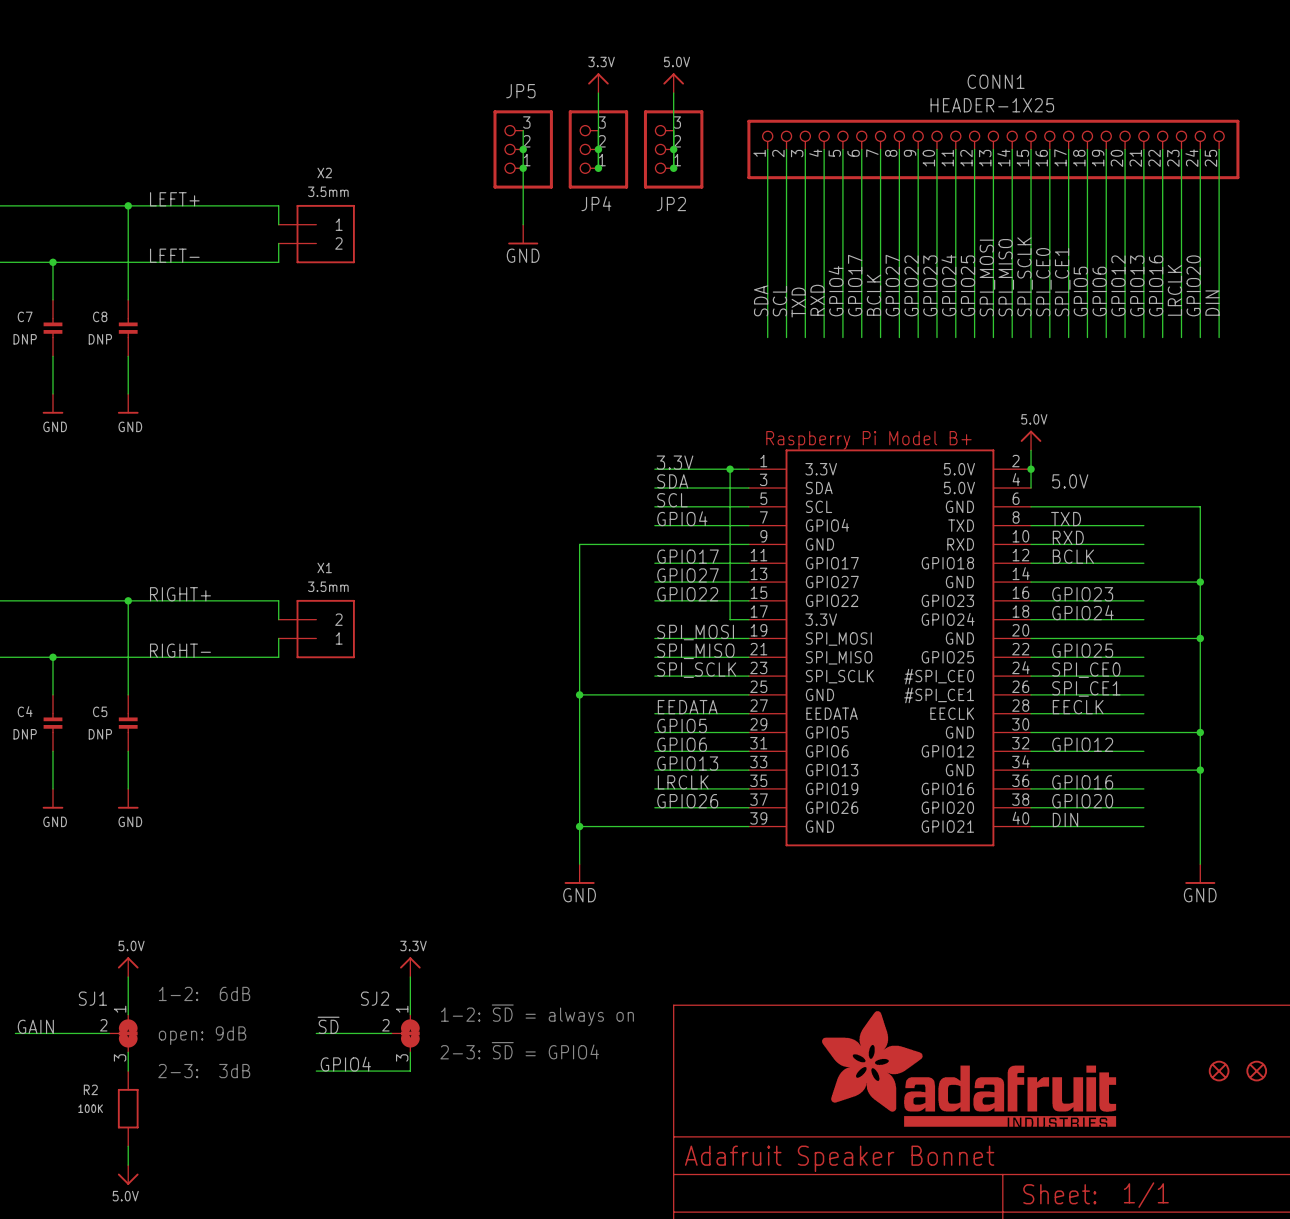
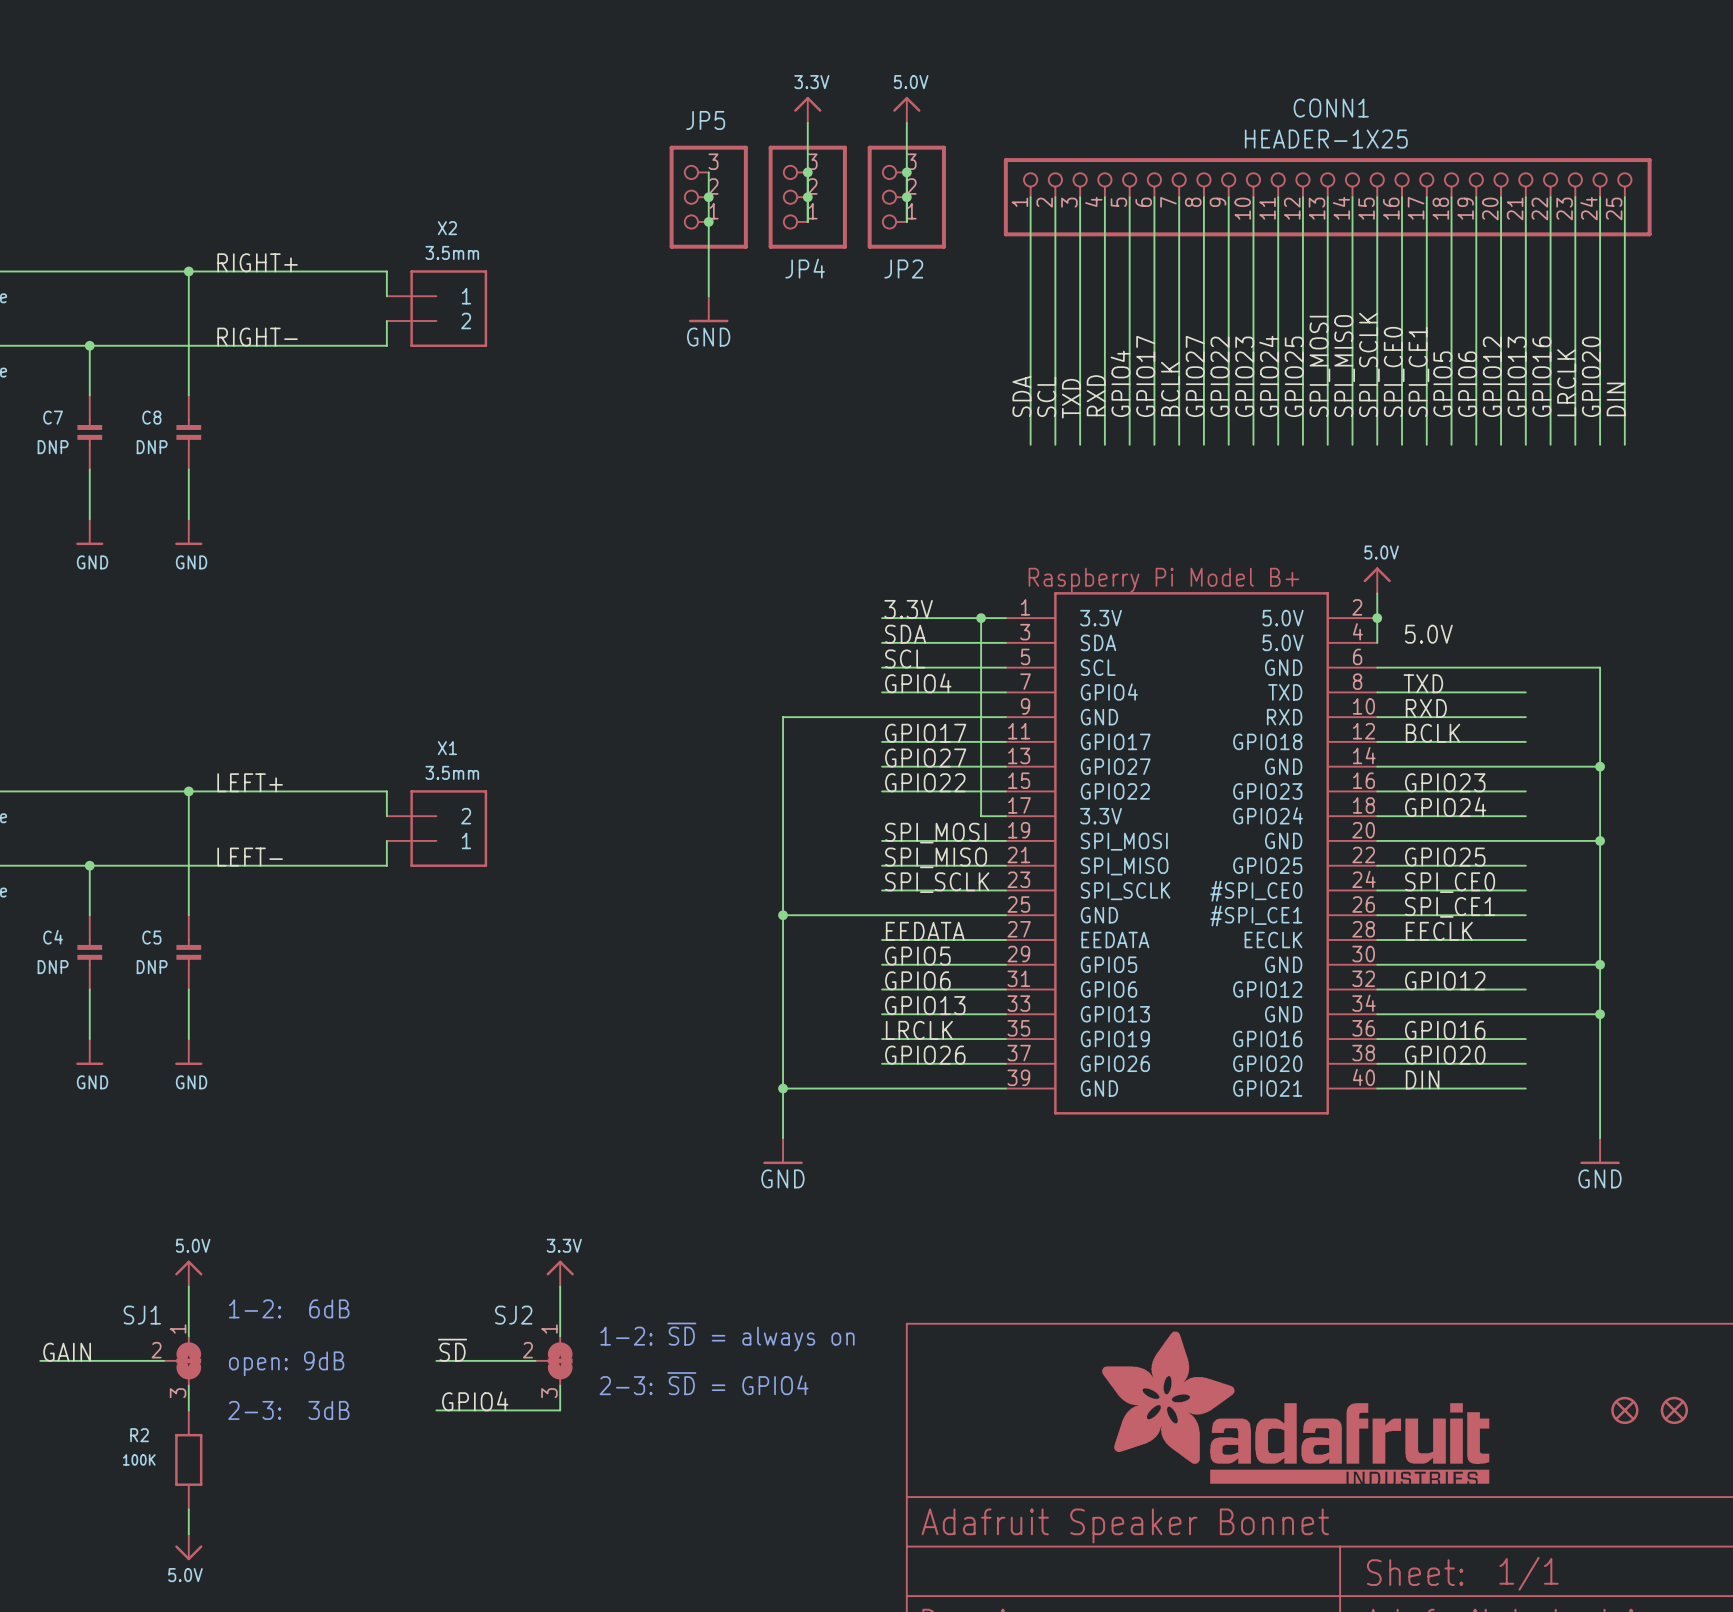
junction position: (598, 168) -> (807, 172)
junction position: (673, 168) -> (906, 172)
label: LEFT+ (174, 199) -> RIGHT+ (257, 262)
label: LEFT- (174, 255) -> RIGHT- (257, 337)
label: RIGHT+ (180, 594) -> LEFT+ (250, 782)
label: RIGHT- (180, 650) -> LEFT- (250, 857)

